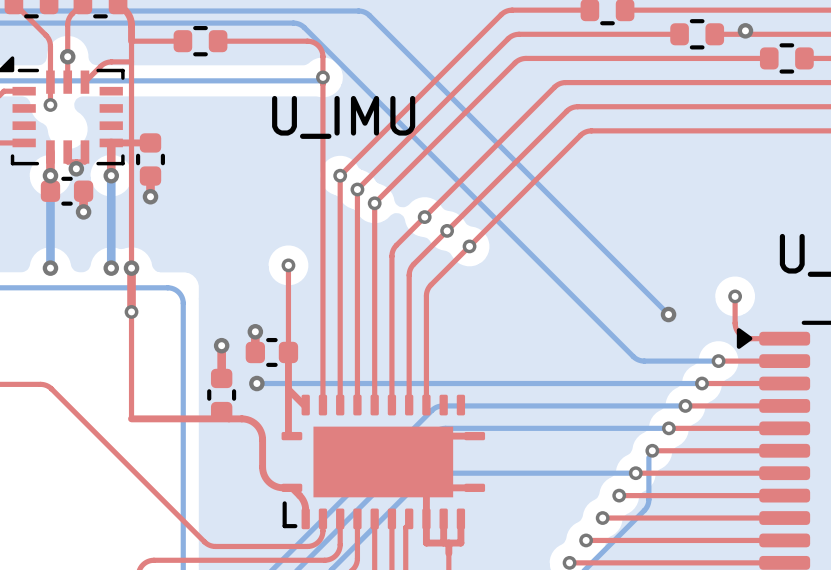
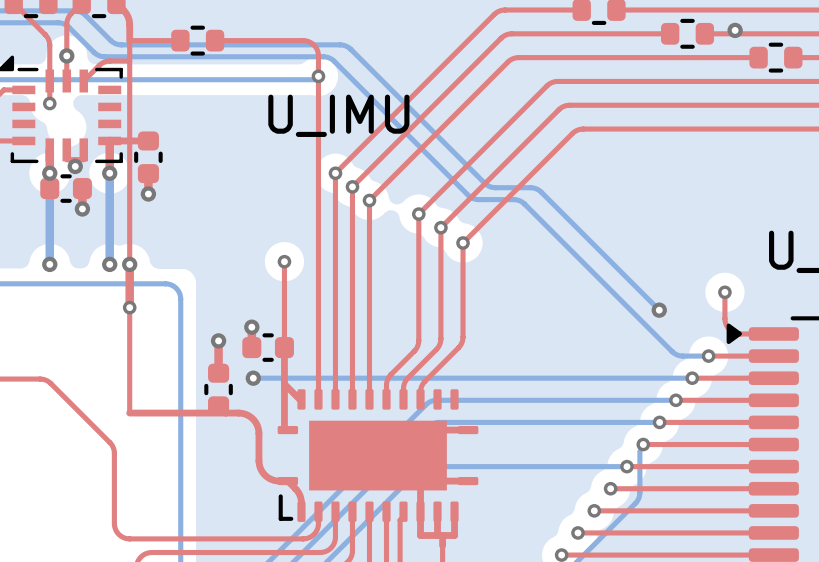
bottom track: (75, 11) (364, 12) (548, 194) -> (74, 10) (84, 14) (111, 41) (119, 44) (345, 46) (485, 184) (494, 187) (531, 187) (541, 192)
bottom track: (58, 23) (294, 23) (303, 26) (338, 62) -> (58, 22) (67, 26) (95, 53) (103, 56) (323, 56) (334, 61)
bottom track: (474, 197) (634, 357) (642, 361) (692, 361) -> (468, 195) (477, 199) (515, 199) (523, 203) (672, 351) (682, 356)
top track: (424, 217) (395, 246) (392, 253) (391, 390) -> (418, 214) (418, 343) (415, 350) (389, 375) (386, 385)
top track: (447, 230) (413, 264) (409, 272) (409, 394) -> (440, 227) (440, 341) (437, 348) (406, 379) (403, 388)
top track: (469, 246) (430, 284) (427, 291) (426, 397) -> (463, 242) (462, 341) (458, 347) (423, 382) (420, 392)
top track: (111, 448) (204, 541) (215, 546) -> (109, 442) (114, 451) (114, 523) (118, 534) (129, 538) (212, 538)

